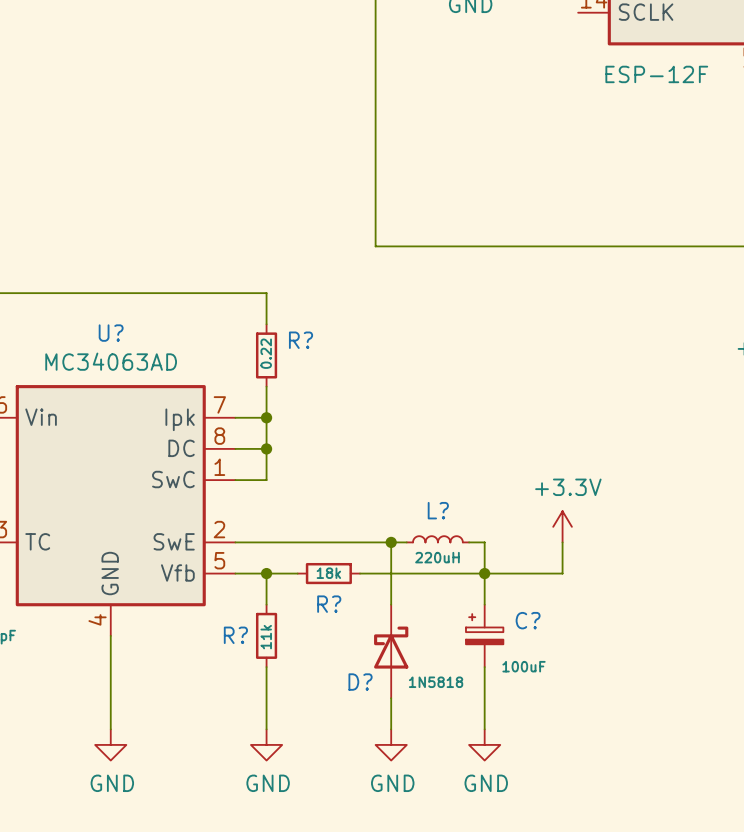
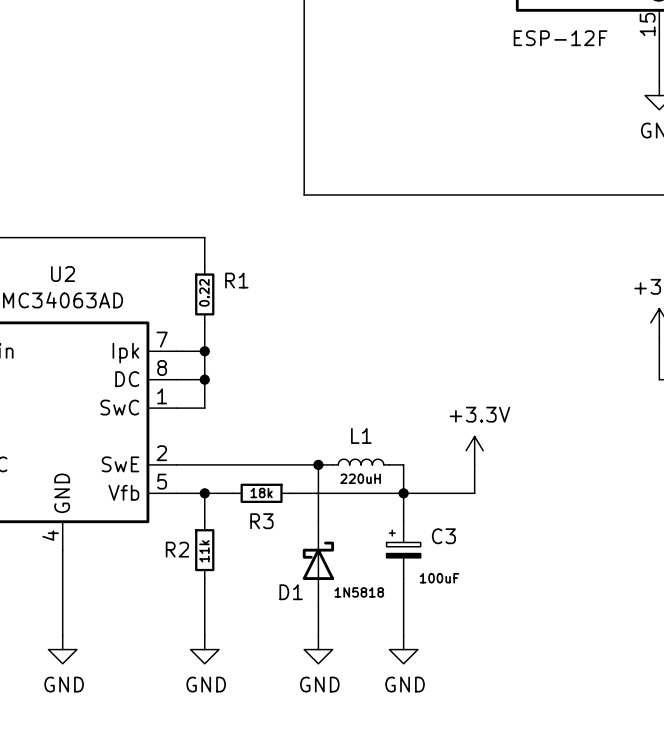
U? name: U? (111, 333) -> U2 (63, 274)
R? name: R? (301, 340) -> R1 (236, 280)
L? name: L? (438, 510) -> L1 (361, 435)
R? name: R? (329, 604) -> R3 (261, 521)
C? name: C? (528, 620) -> C3 (443, 536)
R? name: R? (235, 635) -> R2 (177, 549)
D? name: D? (360, 682) -> D1 (291, 592)

